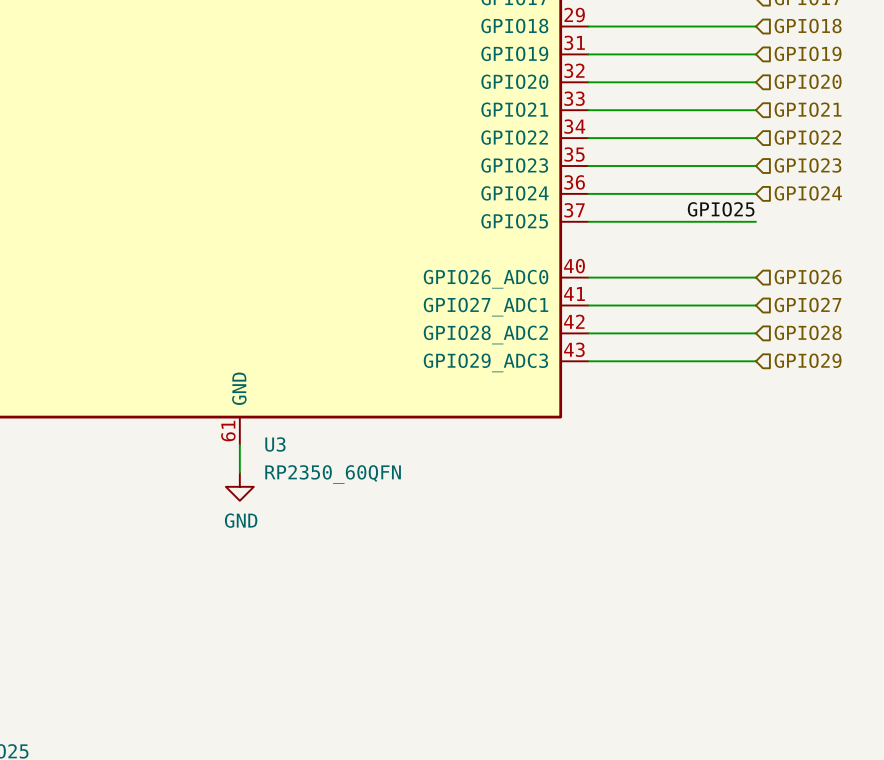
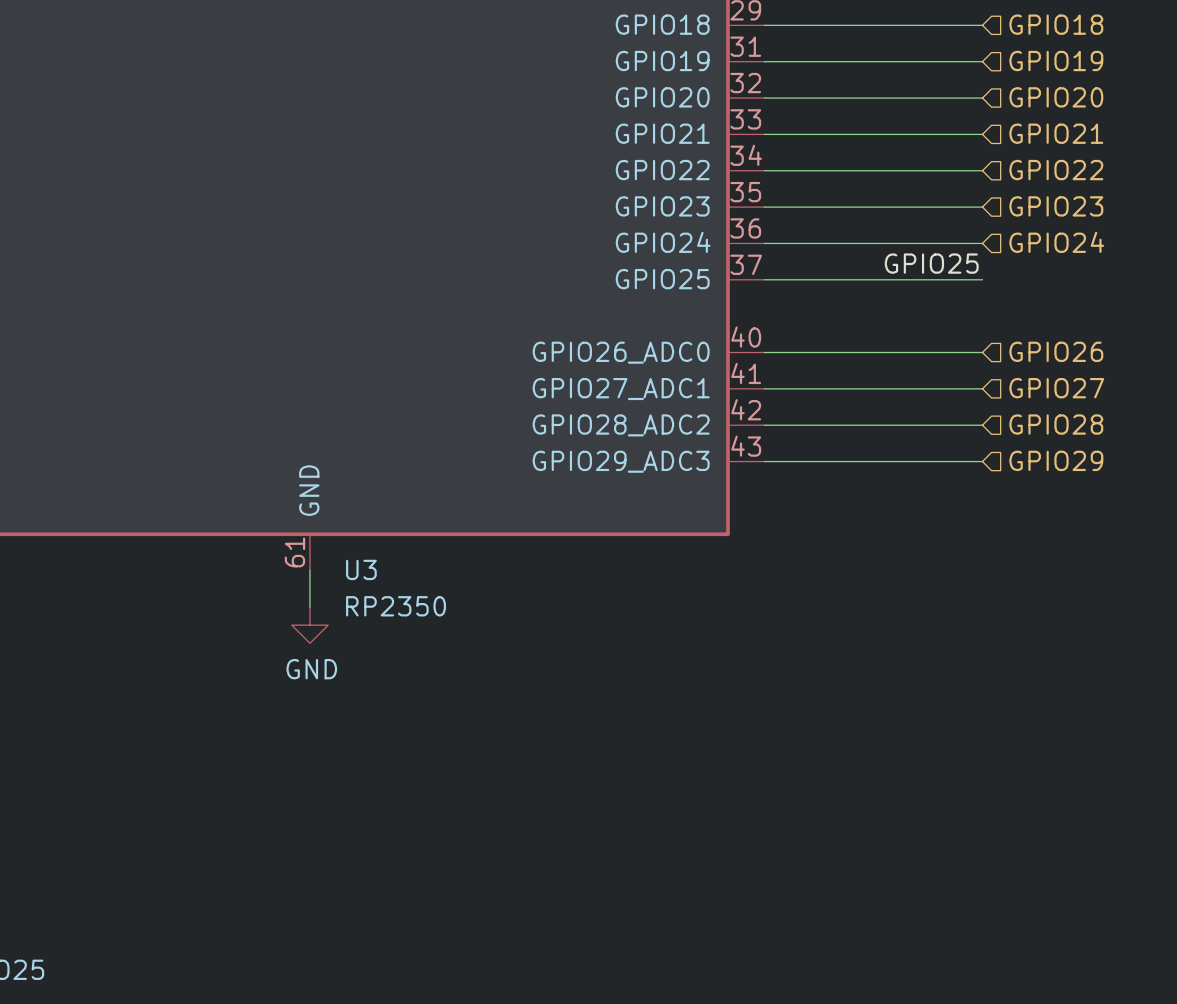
U3 value: RP2350_60QFN (333, 474) -> RP2350 (396, 606)

